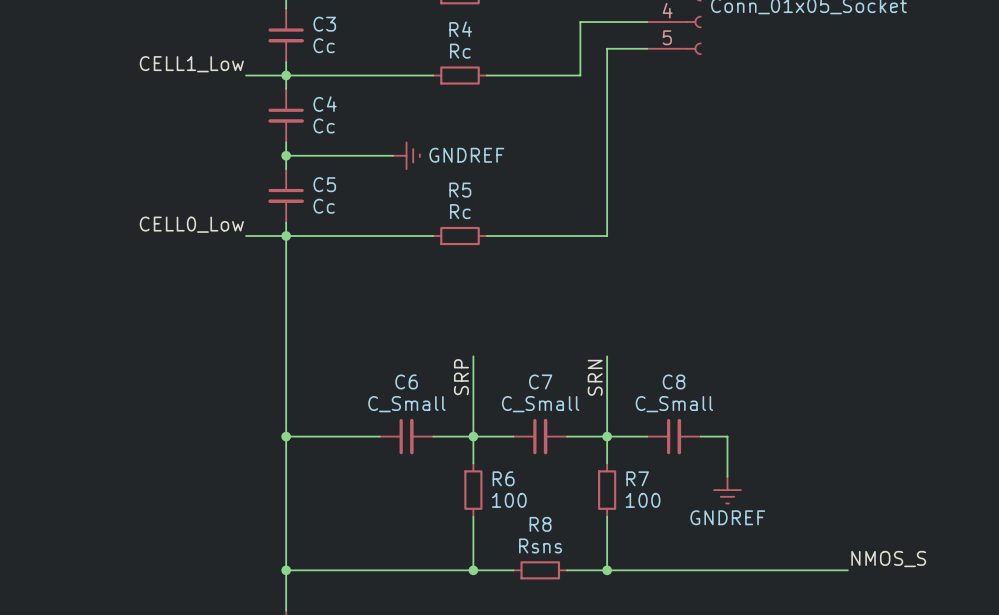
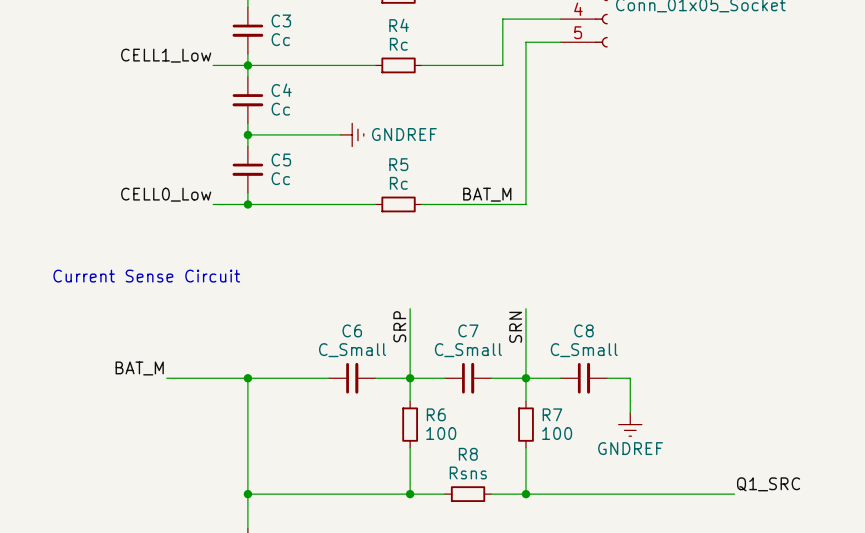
label: none -> BAT_M (487, 194)
wire: (286, 236) (286, 436) -> (166, 378) (247, 378)
text: none -> Current Sense Circuit (146, 276)
label: none -> BAT_M (139, 368)
label: NMOS_S (888, 559) -> Q1_SRC (768, 484)

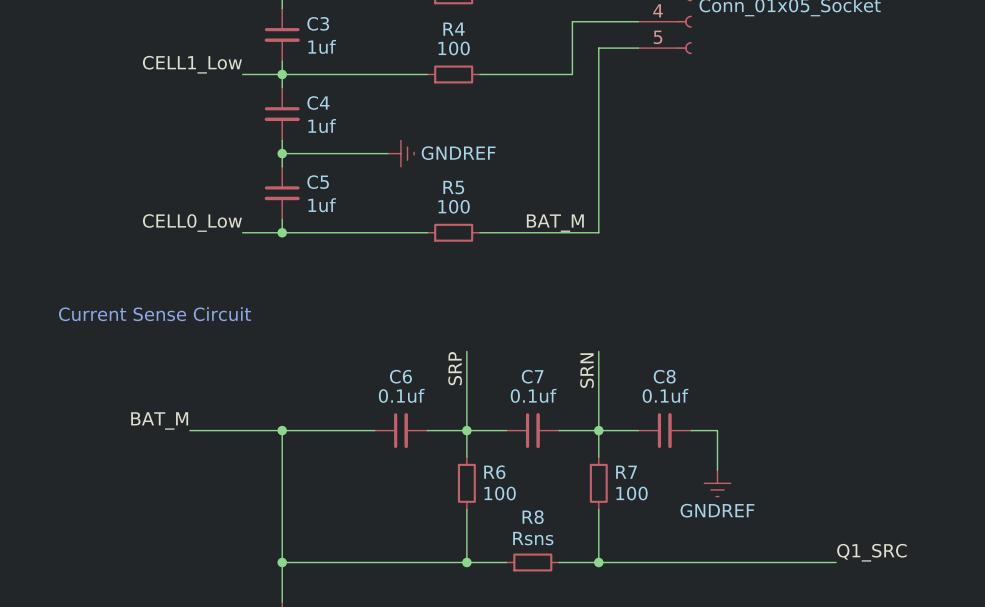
C3 value: Cc (280, 39) -> 1uf (322, 46)
R4 value: Rc (398, 44) -> 100 (454, 48)
C4 value: Cc (280, 109) -> 1uf (322, 126)
C5 value: Cc (280, 178) -> 1uf (322, 205)
R5 value: Rc (398, 183) -> 100 (454, 206)
C6 value: C_Small (352, 350) -> 0.1uf (401, 395)
C7 value: C_Small (468, 350) -> 0.1uf (533, 395)
C8 value: C_Small (584, 350) -> 0.1uf (665, 395)

